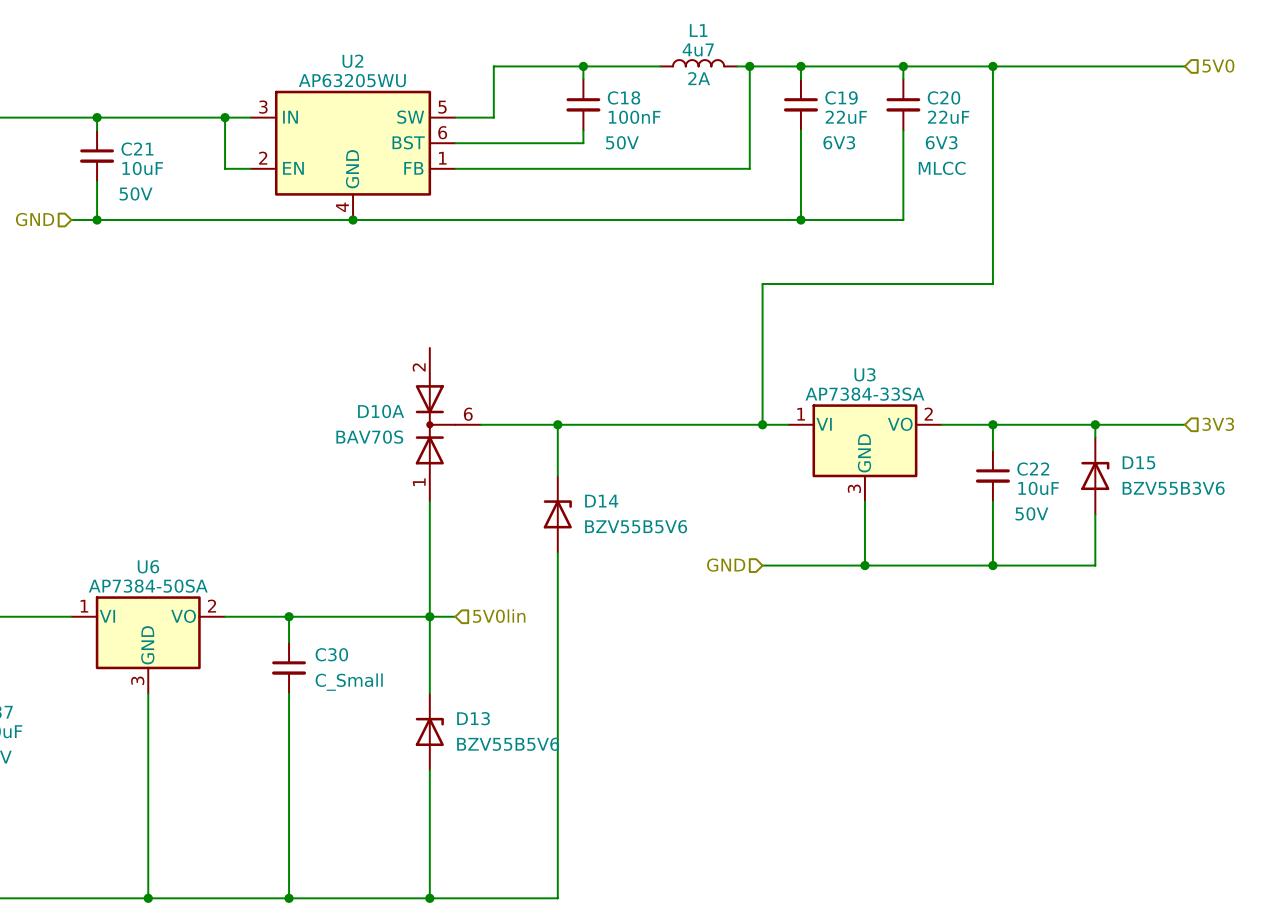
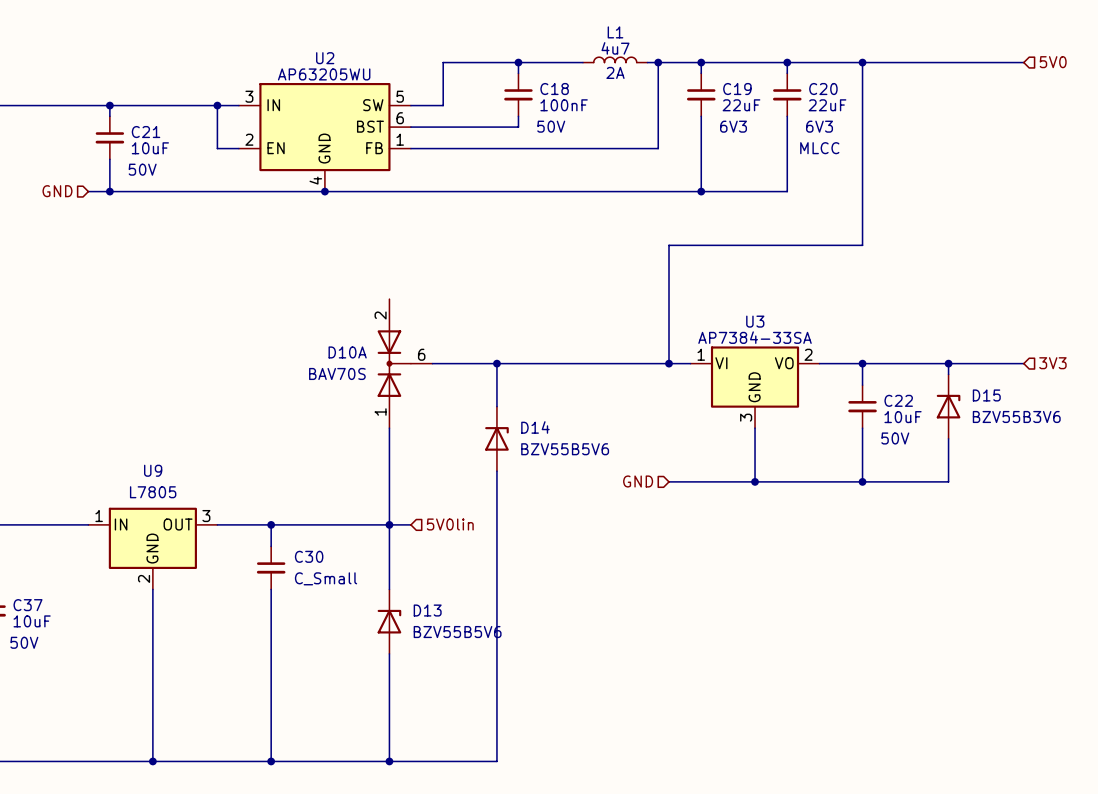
U6 name: U6 (148, 566) -> U9 (153, 470)
U6 value: AP7384-50SA (148, 586) -> L7805 (153, 492)
U6 pin number: 2 (212, 606) -> 3 (206, 516)
U6 pin name: VI (107, 616) -> IN (121, 524)
U6 pin name: VO (183, 616) -> OUT (178, 524)
U6 pin number: 3 (137, 680) -> 2 (144, 578)

